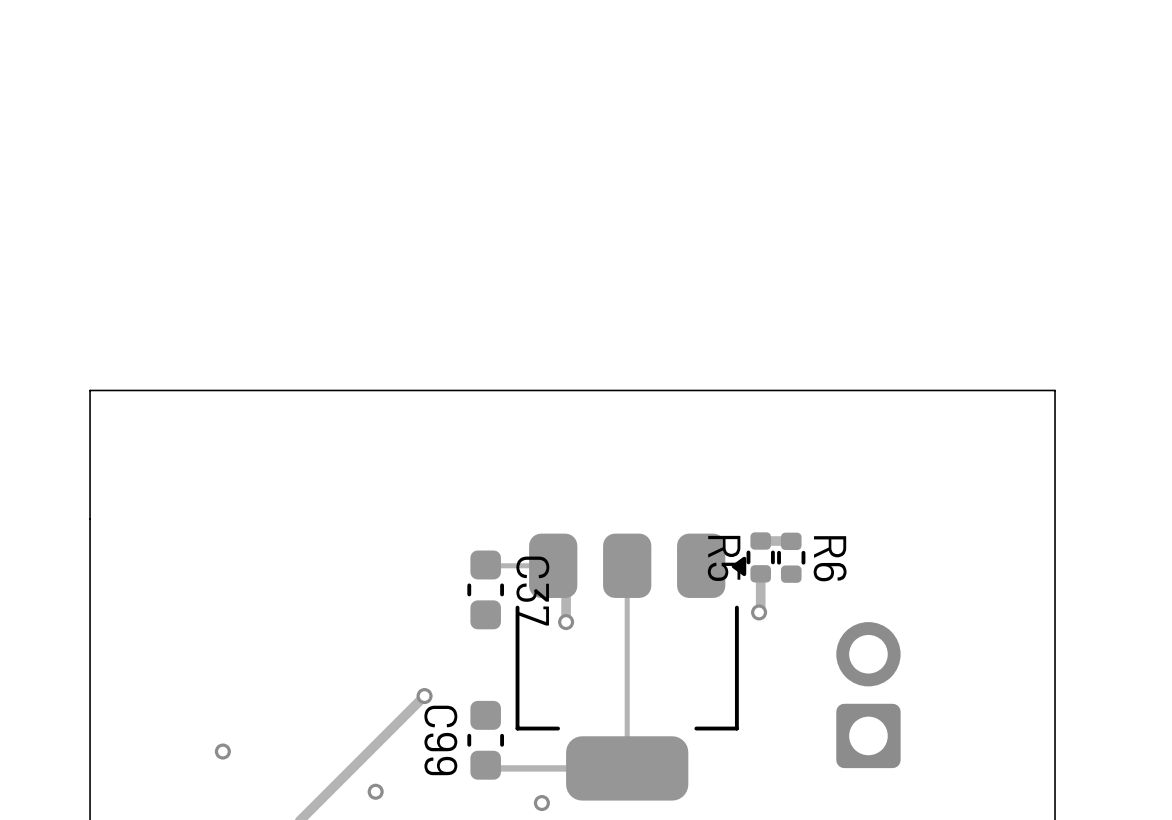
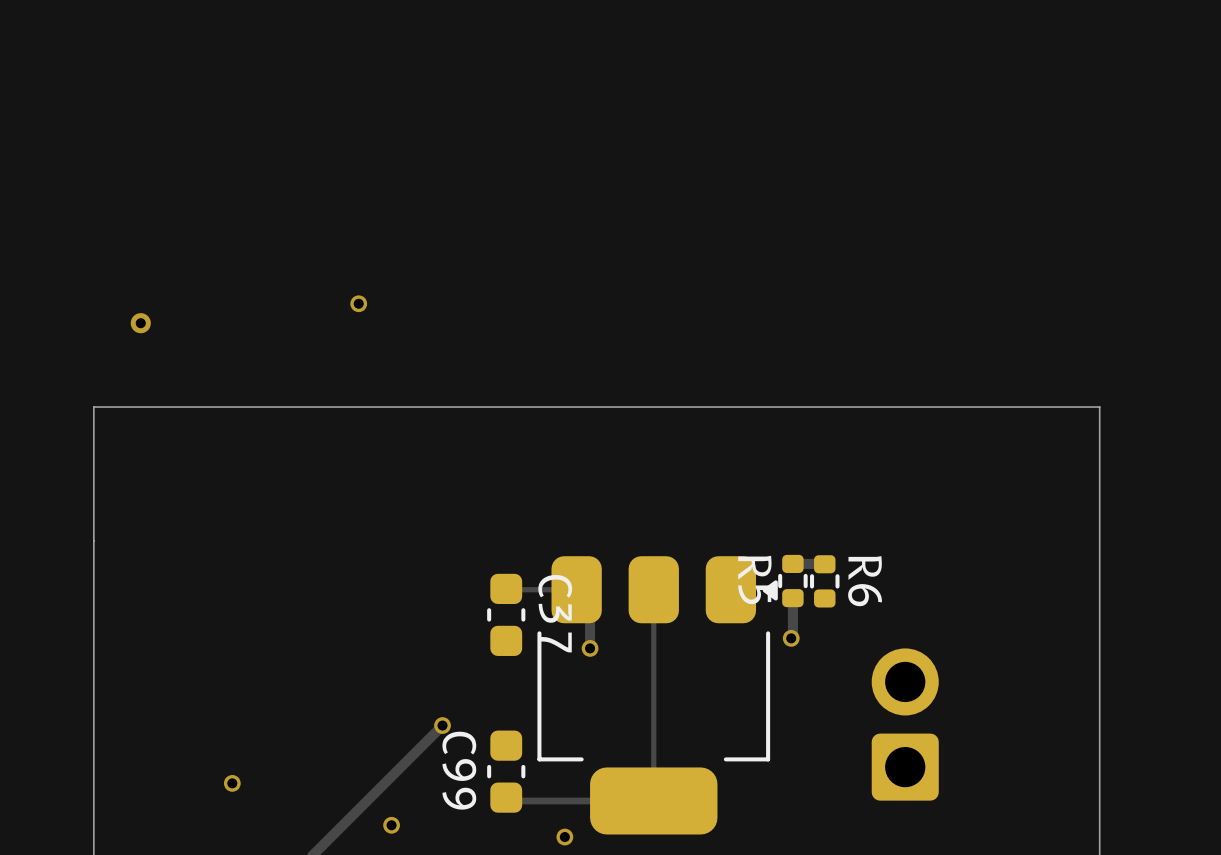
via: none -> (358, 303)
via: none -> (140, 323)

